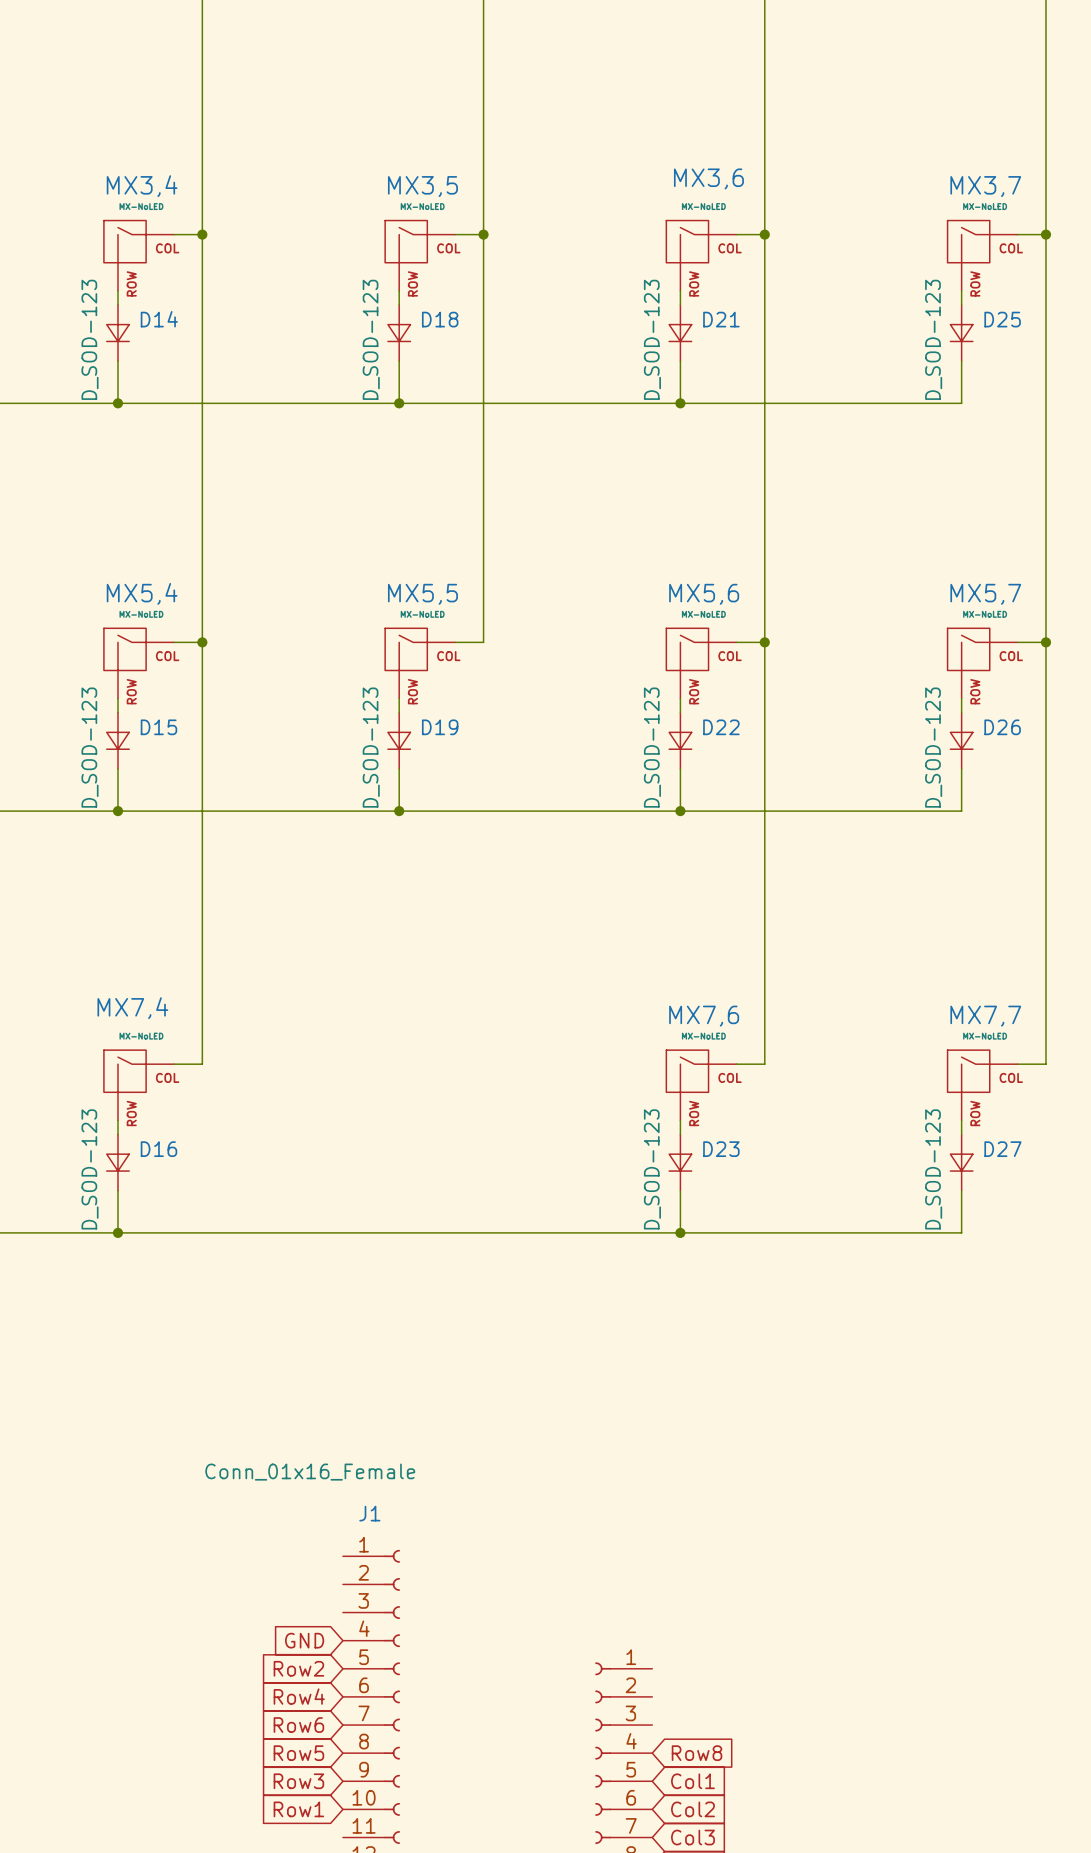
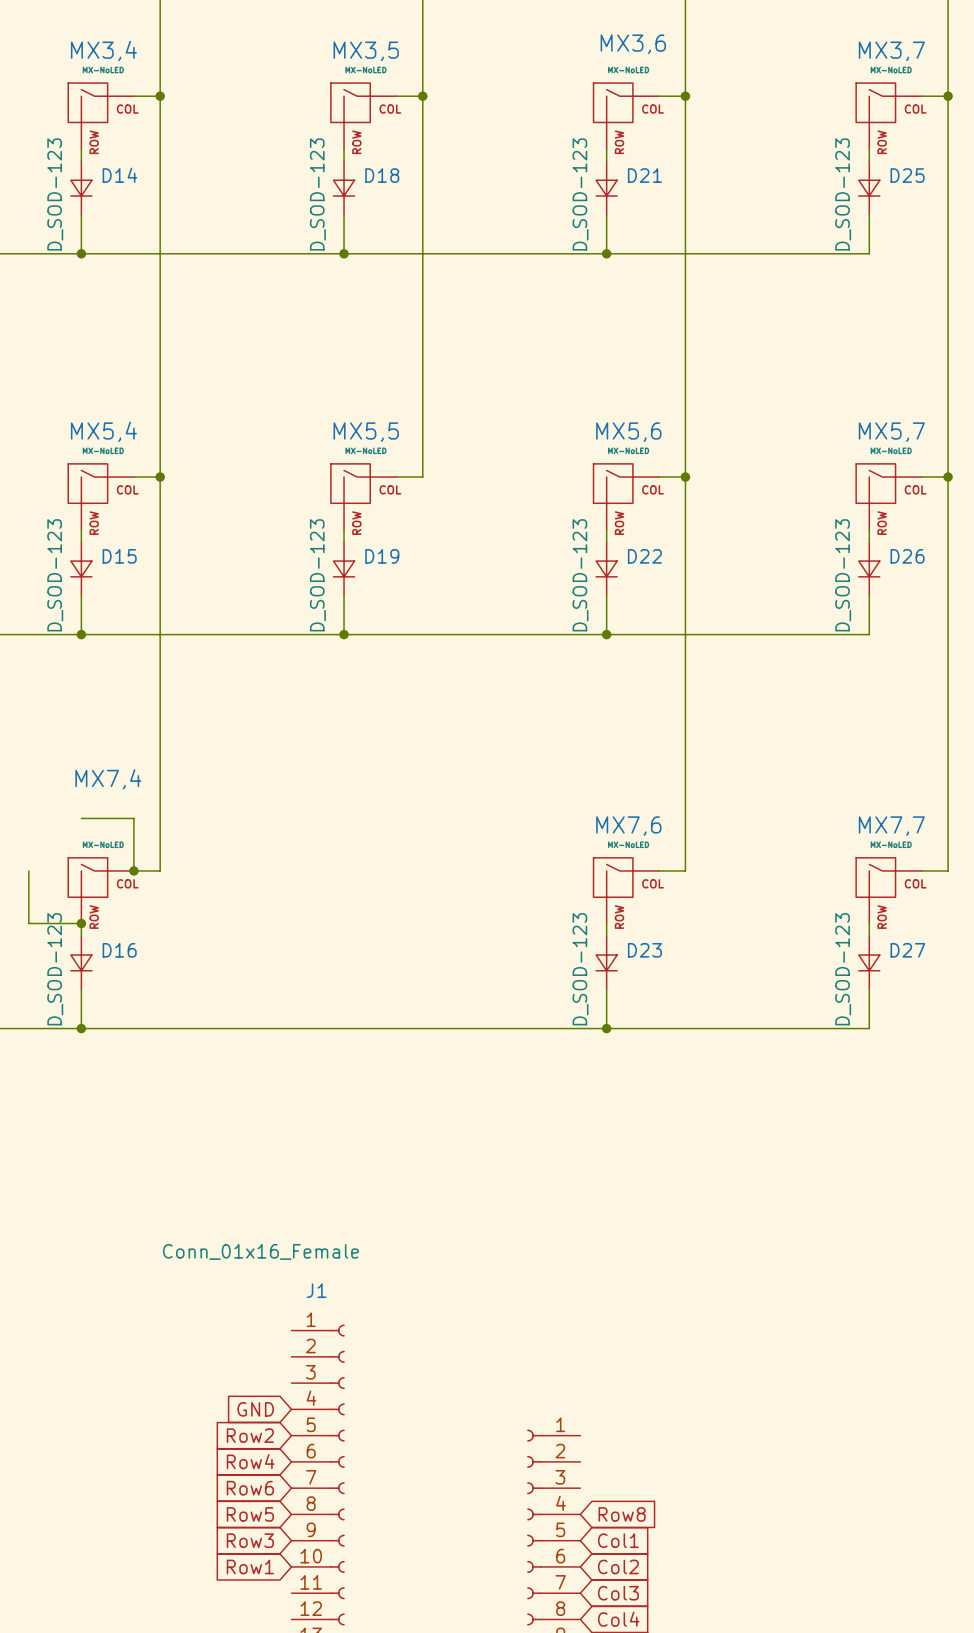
wire: none -> (81, 818) (133, 818) (133, 870)
MX7,4 name position: MX7,4 (132, 1008) -> MX7,4 (108, 779)
wire: none -> (28, 870) (28, 923) (81, 923)
junction: none -> (133, 870)
junction: none -> (81, 923)

